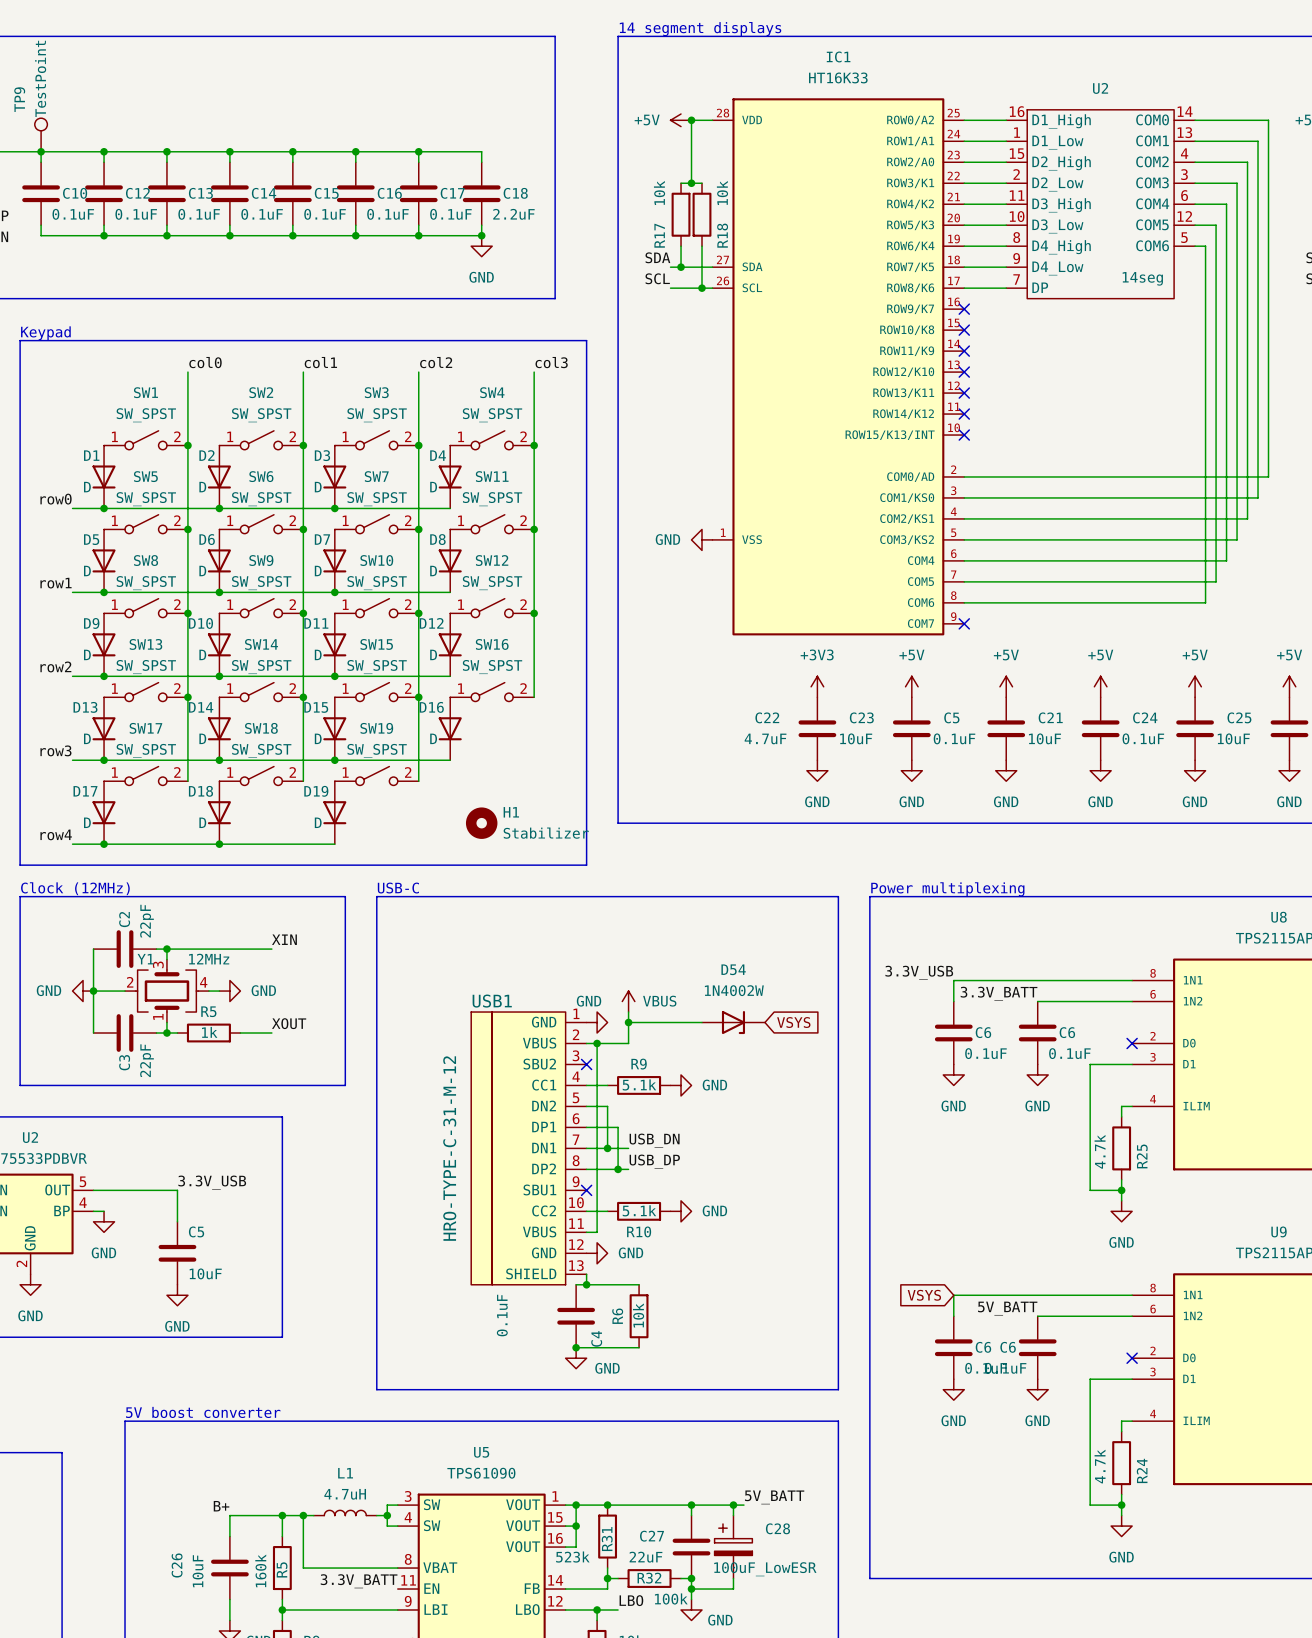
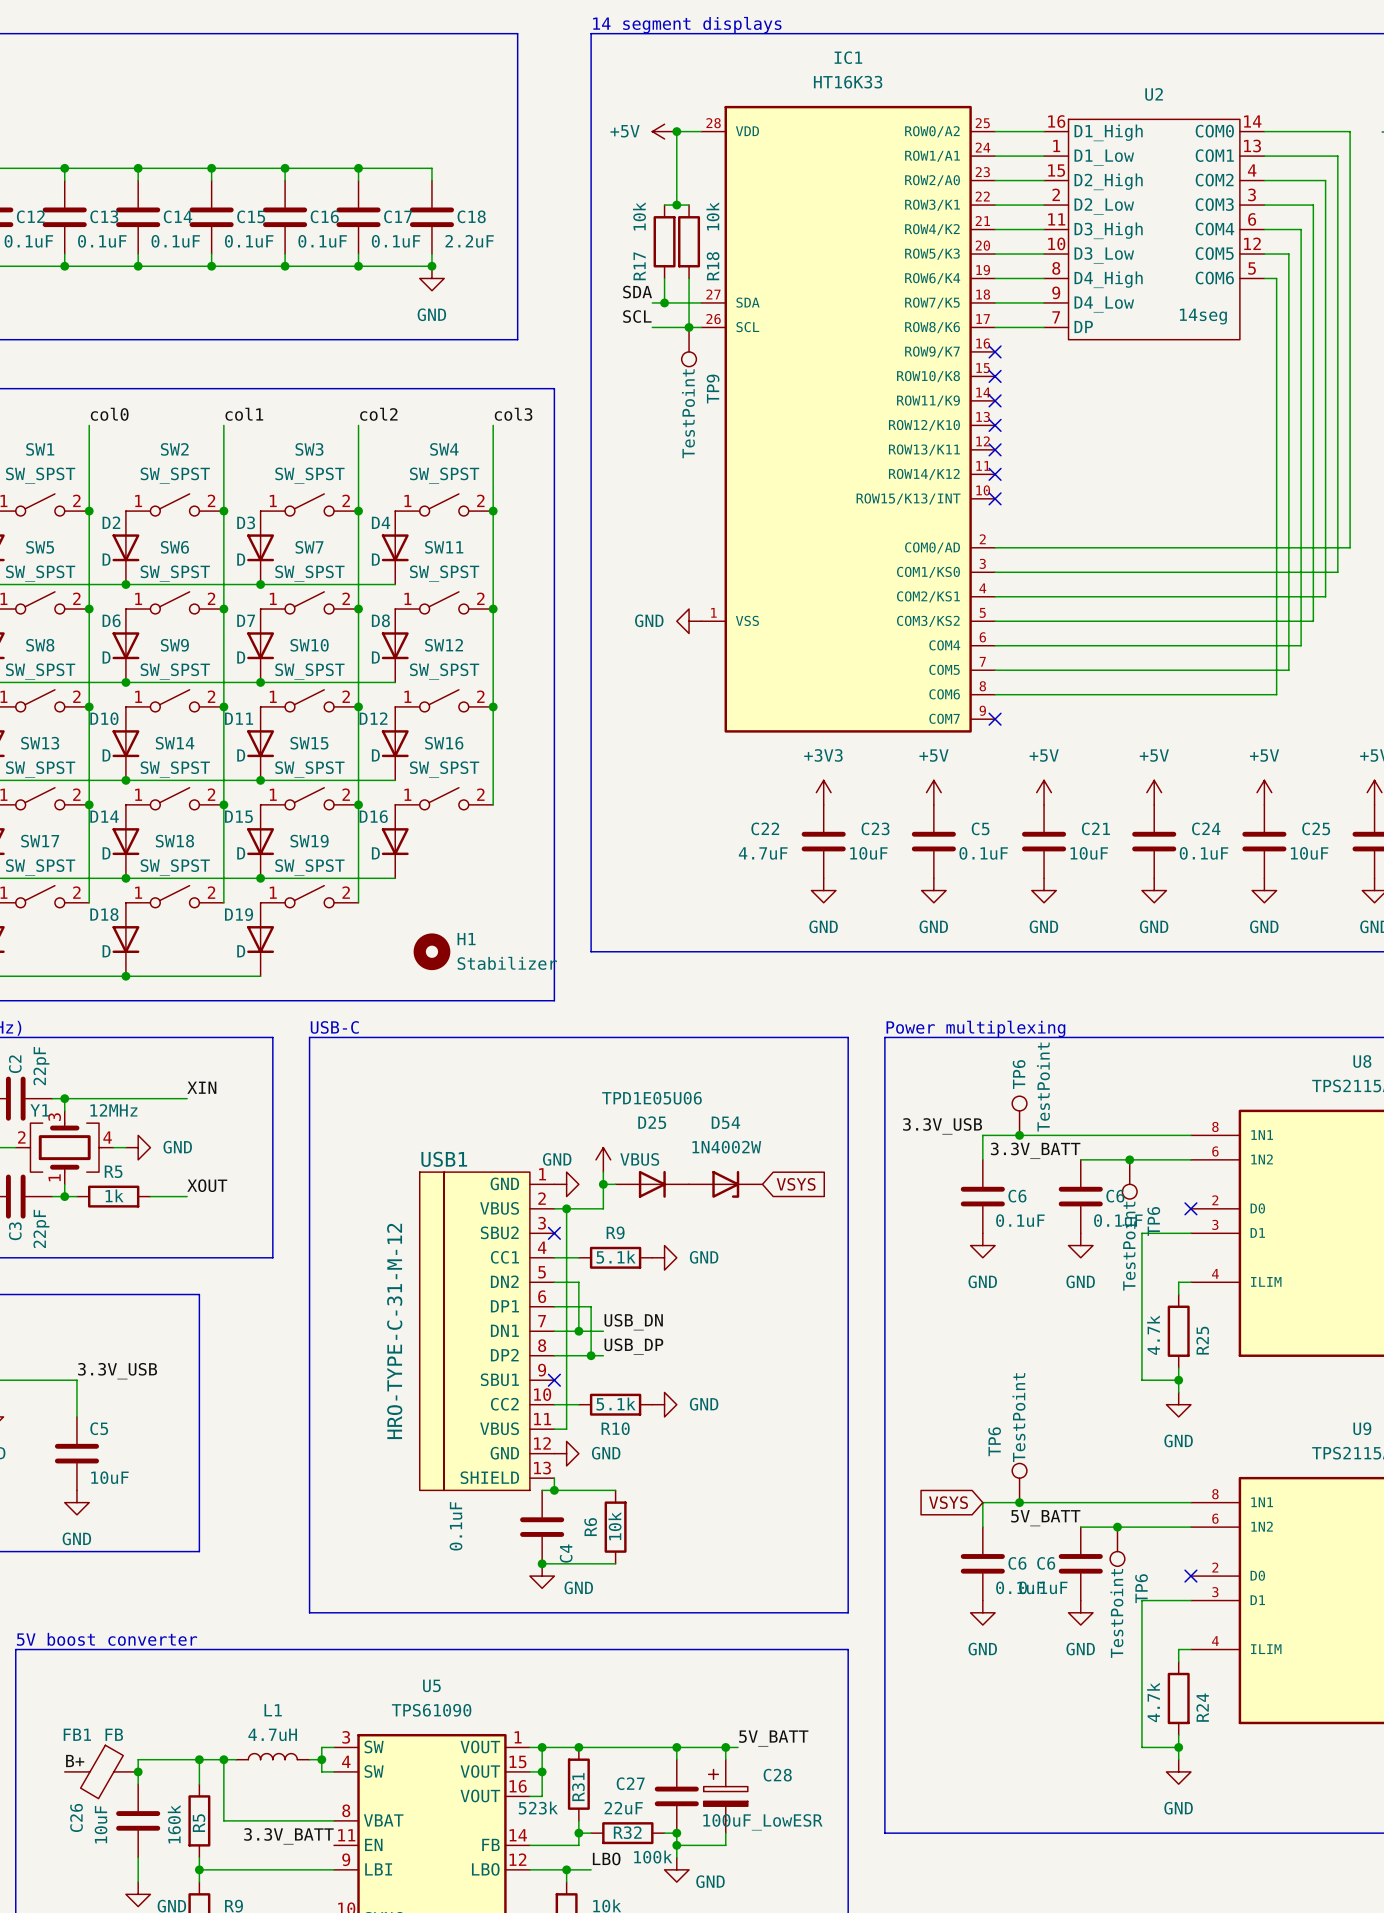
TP9: none -> TestPoint (689, 347)
TP6: none -> TestPoint (1019, 1115)
junction: none -> (1019, 1135)
junction: none -> (1129, 1159)
TP6: none -> TestPoint (1129, 1179)
D25: none -> TPD1E05U06 (652, 1184)
TP6: none -> TestPoint (1019, 1483)
junction: none -> (1019, 1502)
junction: none -> (1117, 1527)
TP6: none -> TestPoint (1117, 1546)
label position: B+ (221, 1506) -> B+ (75, 1761)
FB1: none -> FB (101, 1771)
junction: none -> (138, 1771)

